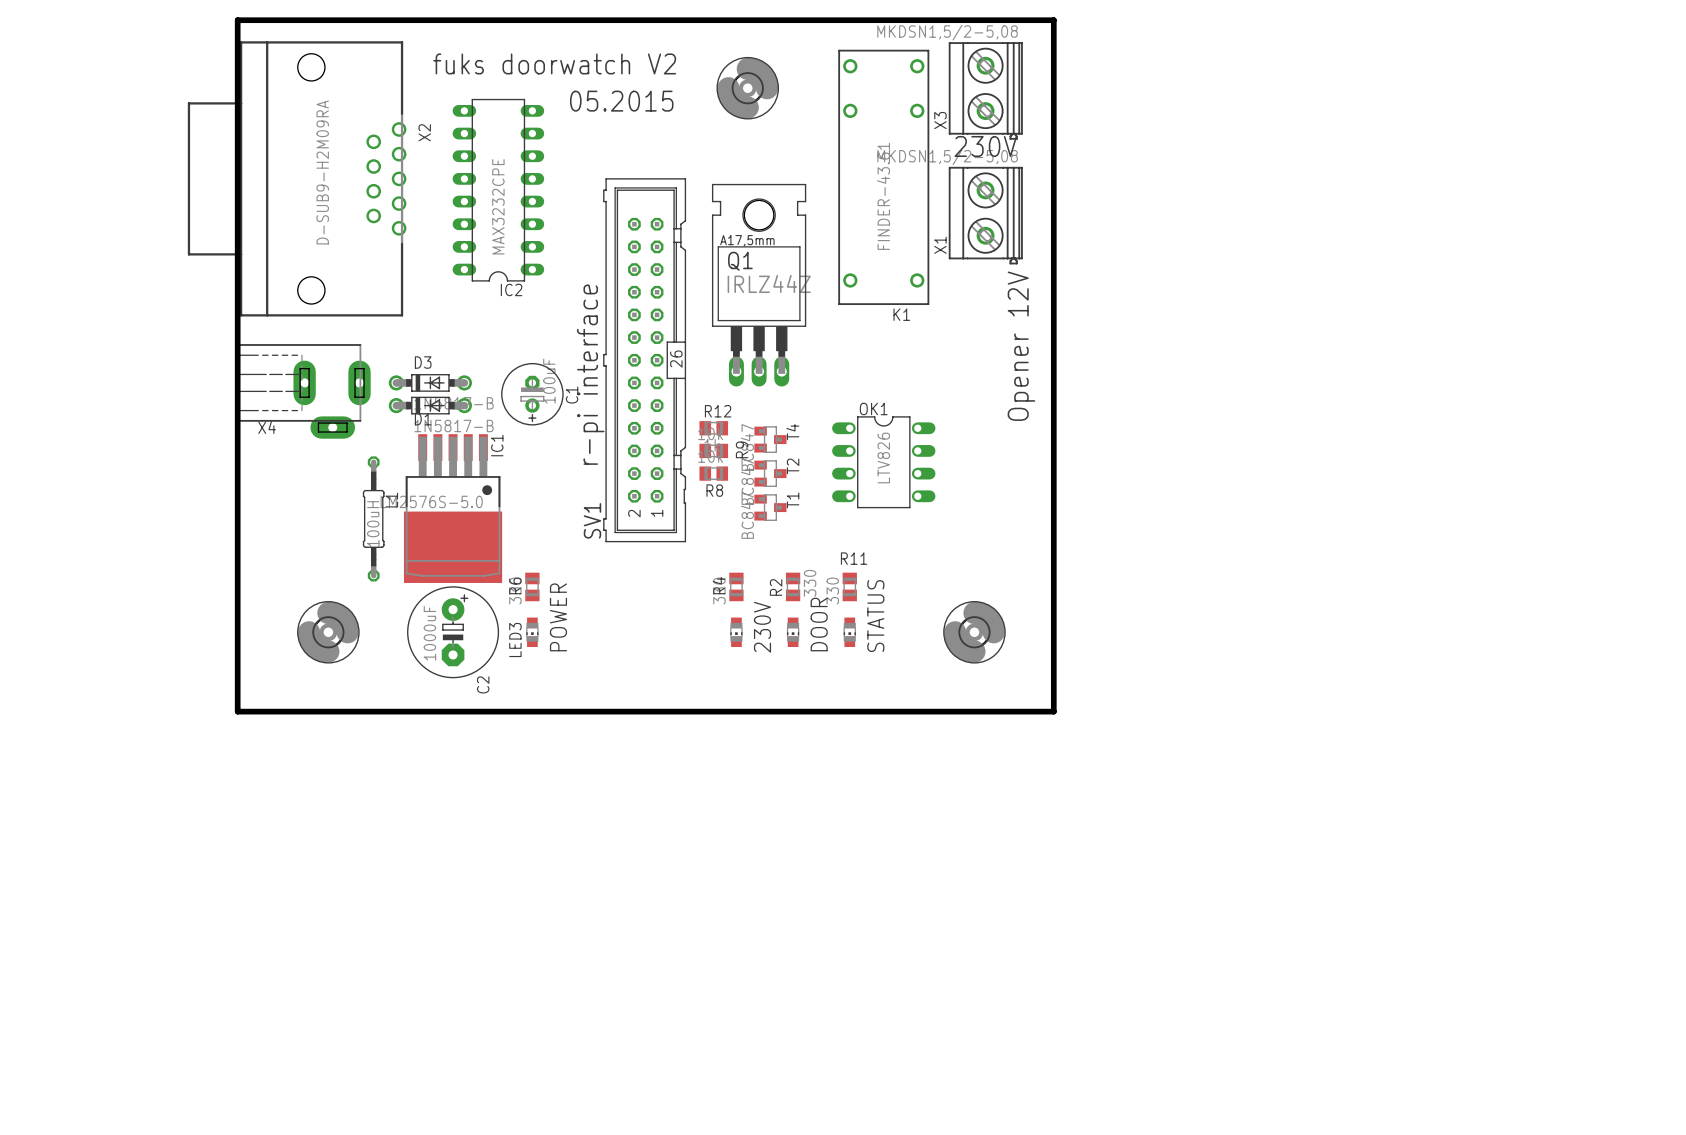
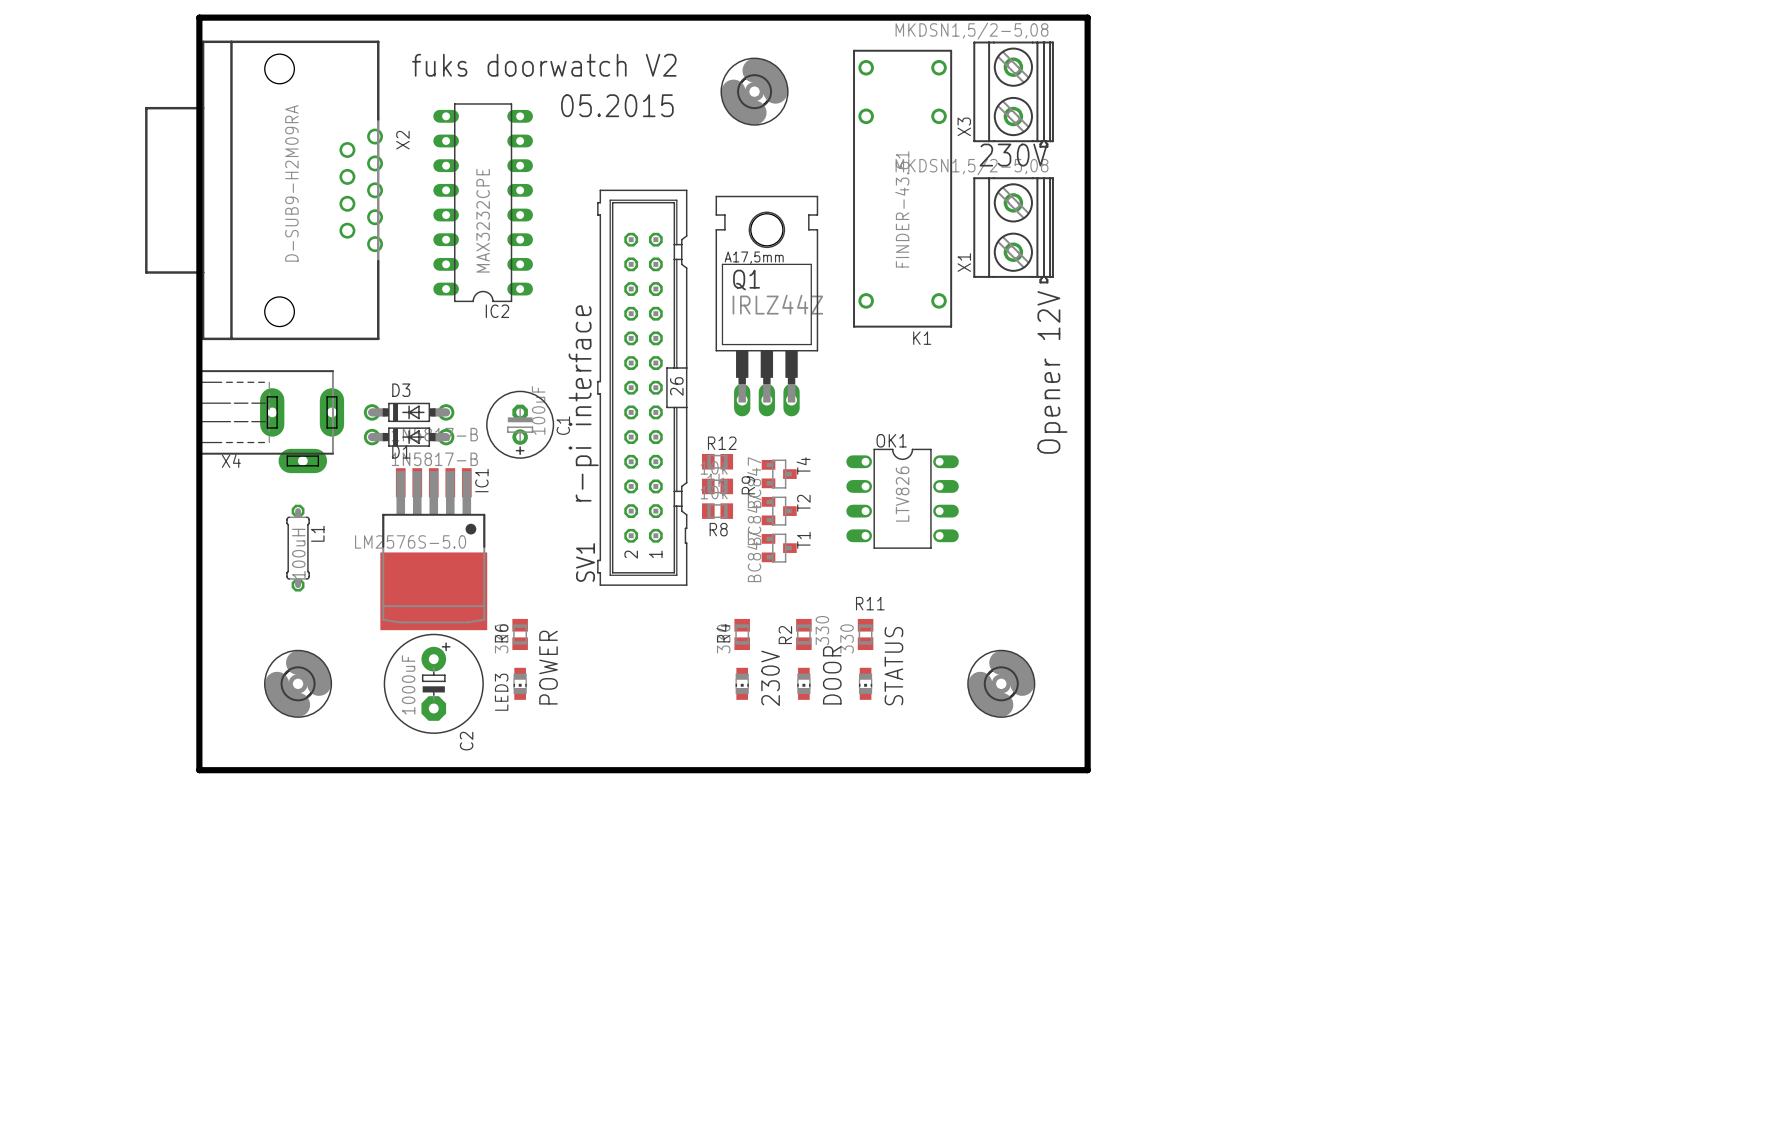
L1 footprint: [362, 456, 385, 582] -> [286, 504, 310, 592]

